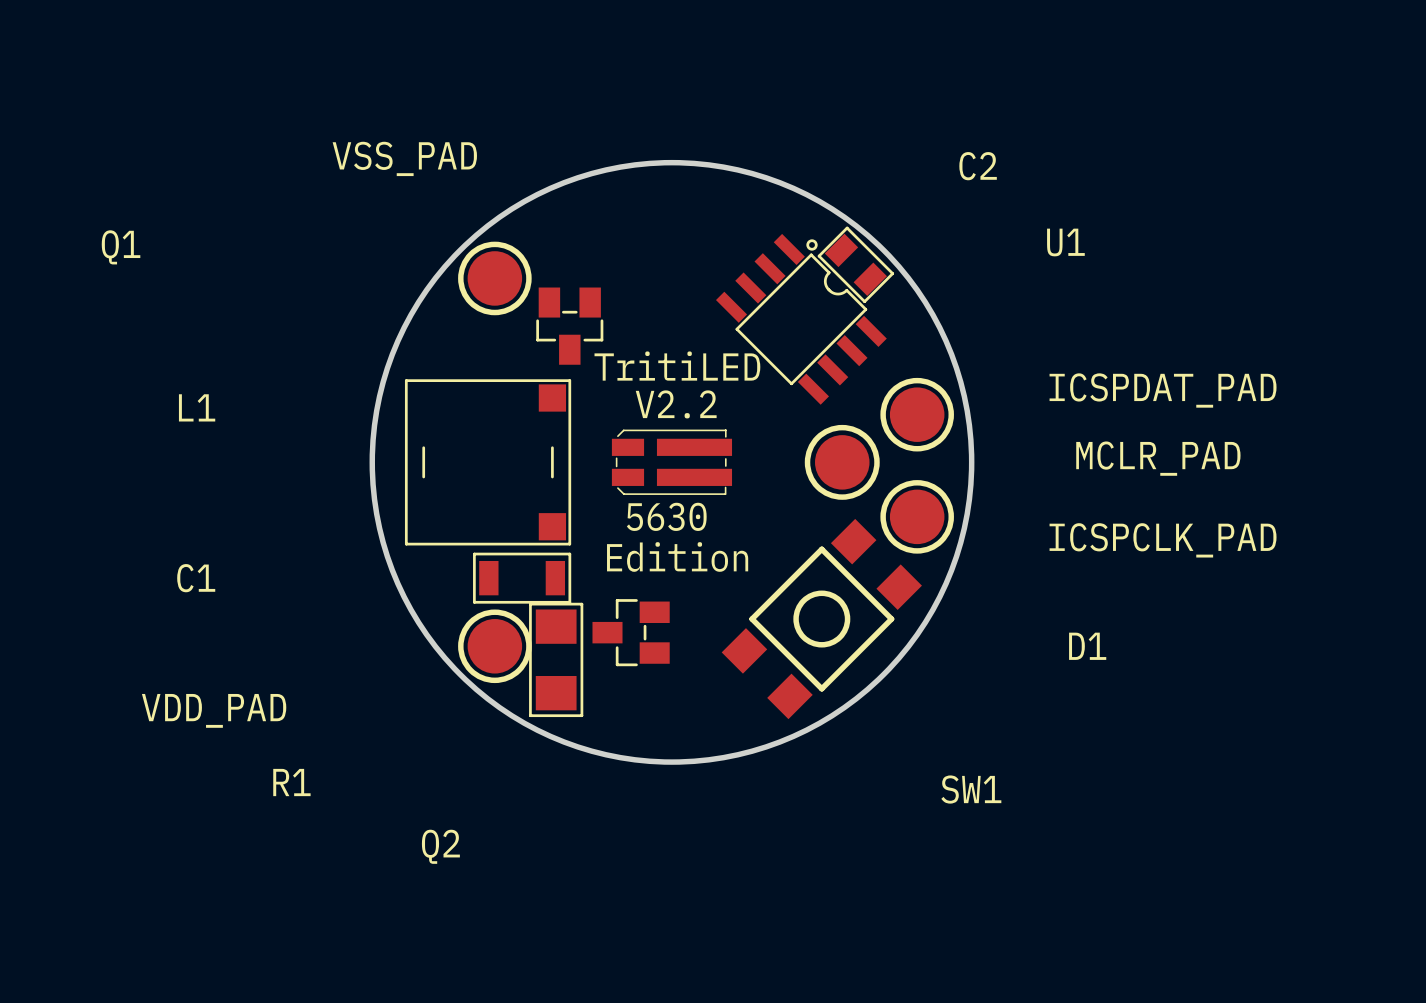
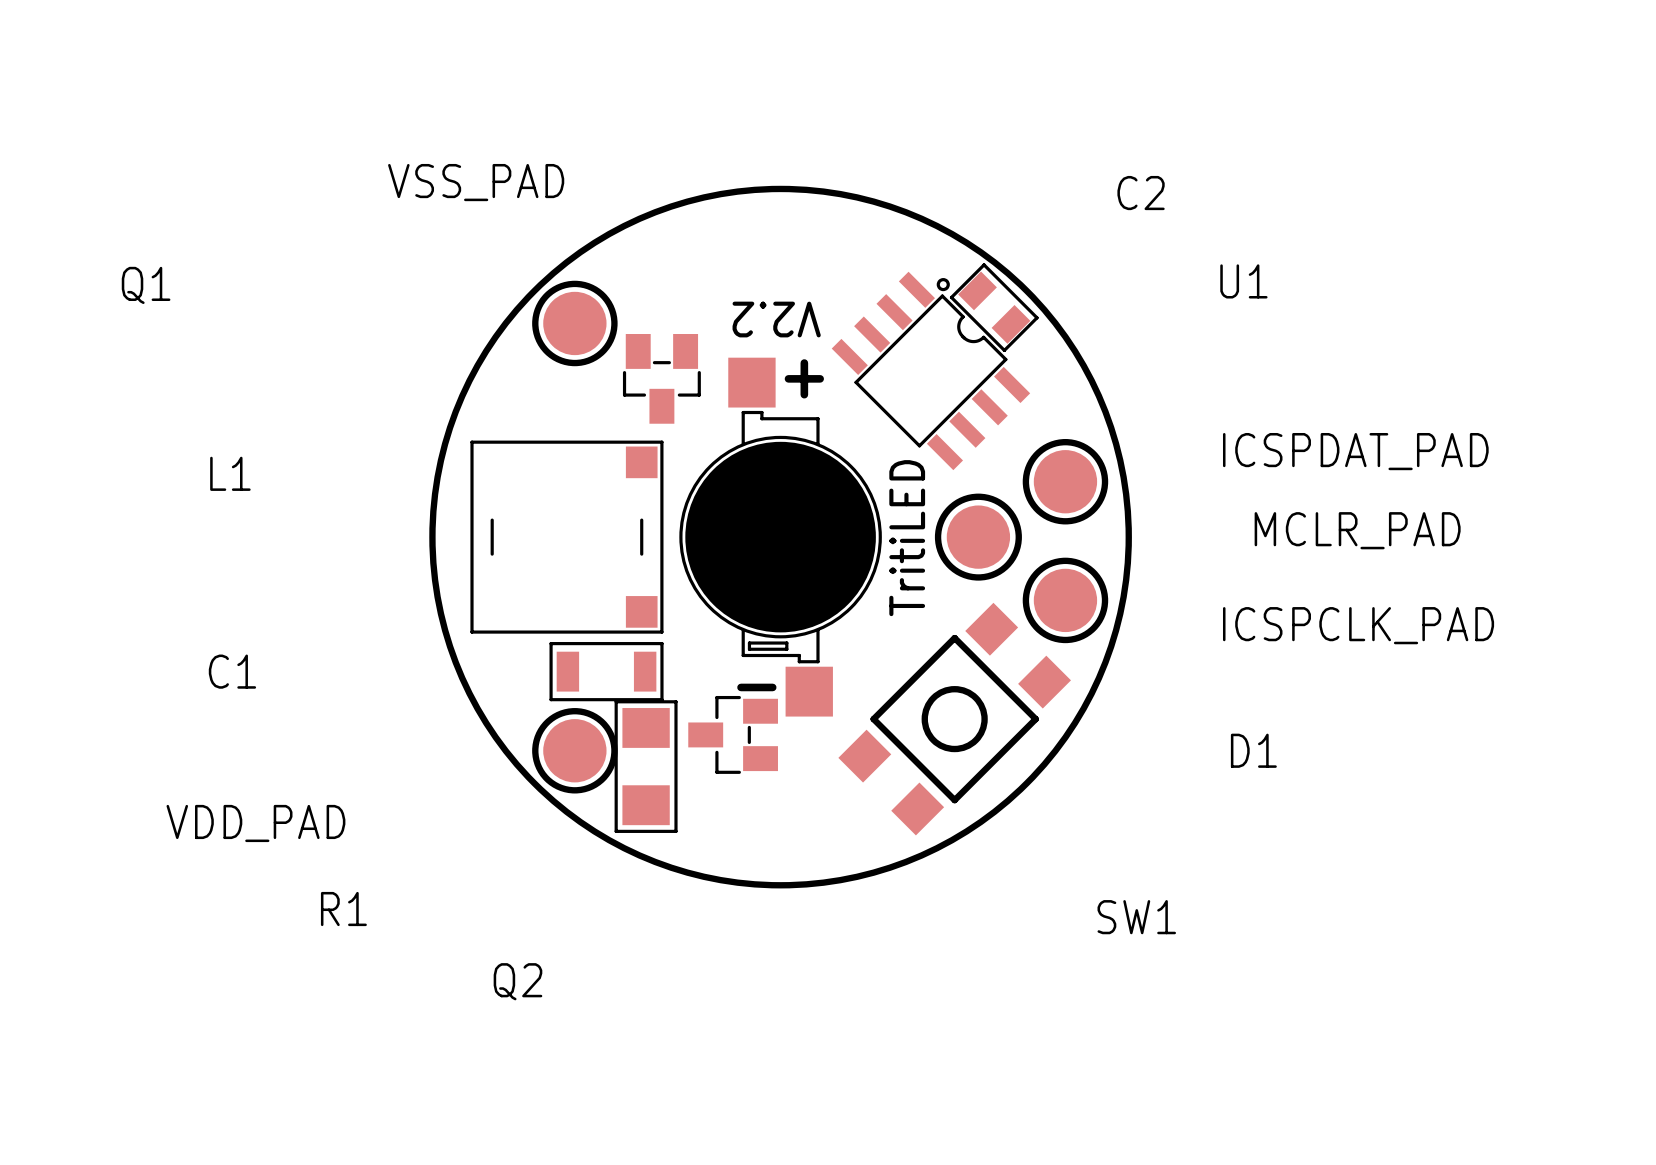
line: none -> (804, 363) (804, 394)
line: none -> (788, 378) (820, 378)
text rotation: 0° (677, 366) -> 90° counterclockwise (907, 538)
drawing: none -> [685, 441, 876, 633]
text rotation: 0° (676, 404) -> 180° (776, 319)
text position: V2.2 (676, 404) -> V2.2 (776, 319)
D1 footprint: [611, 429, 733, 495] -> [679, 357, 882, 717]
text: 5630 (666, 516) -> none
text: Edition (677, 556) -> none
line: none -> (741, 687) (772, 687)

